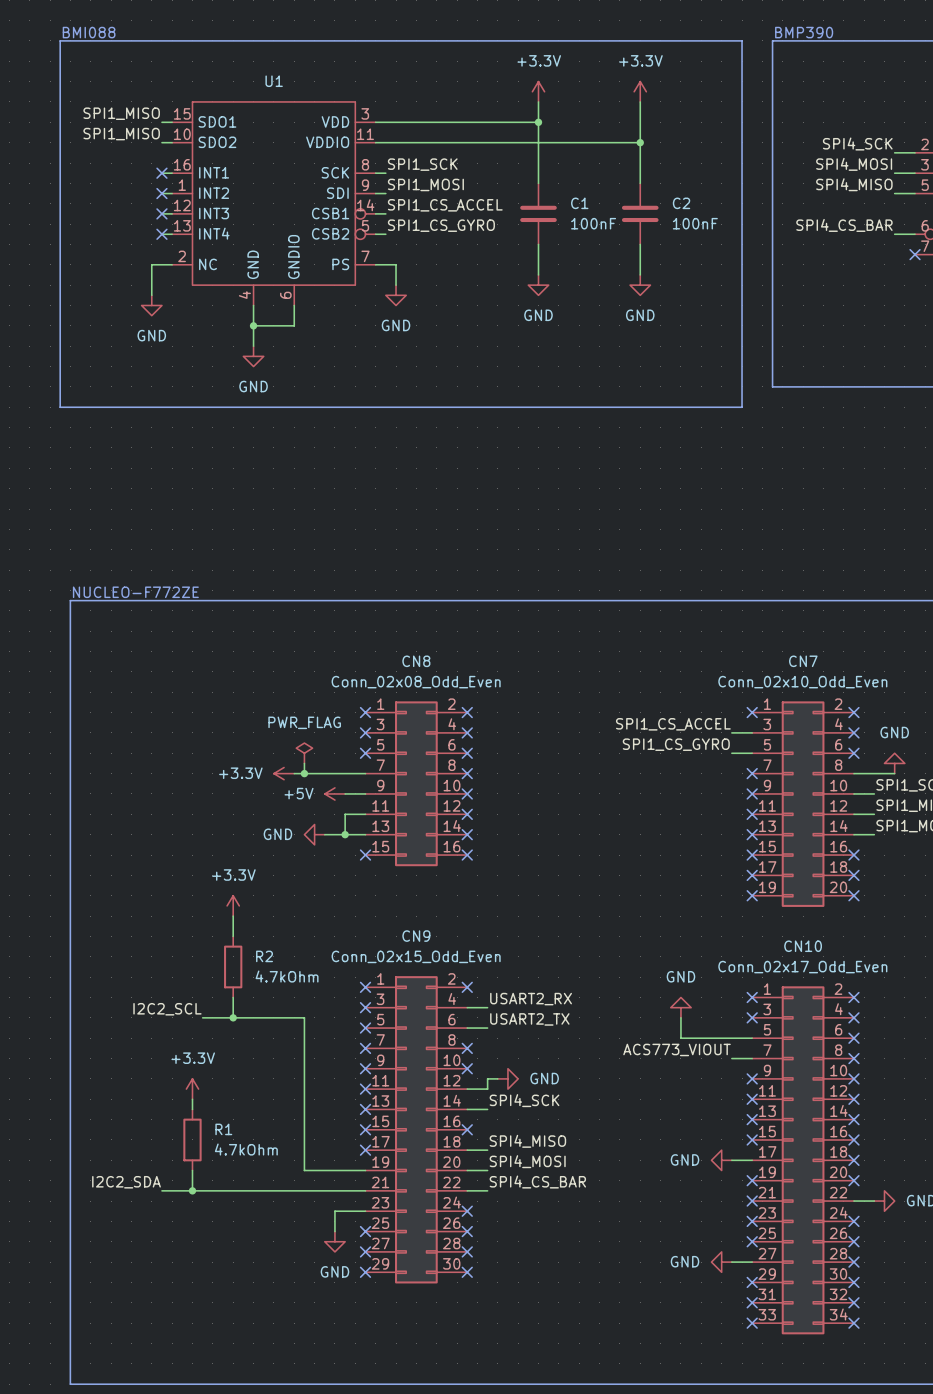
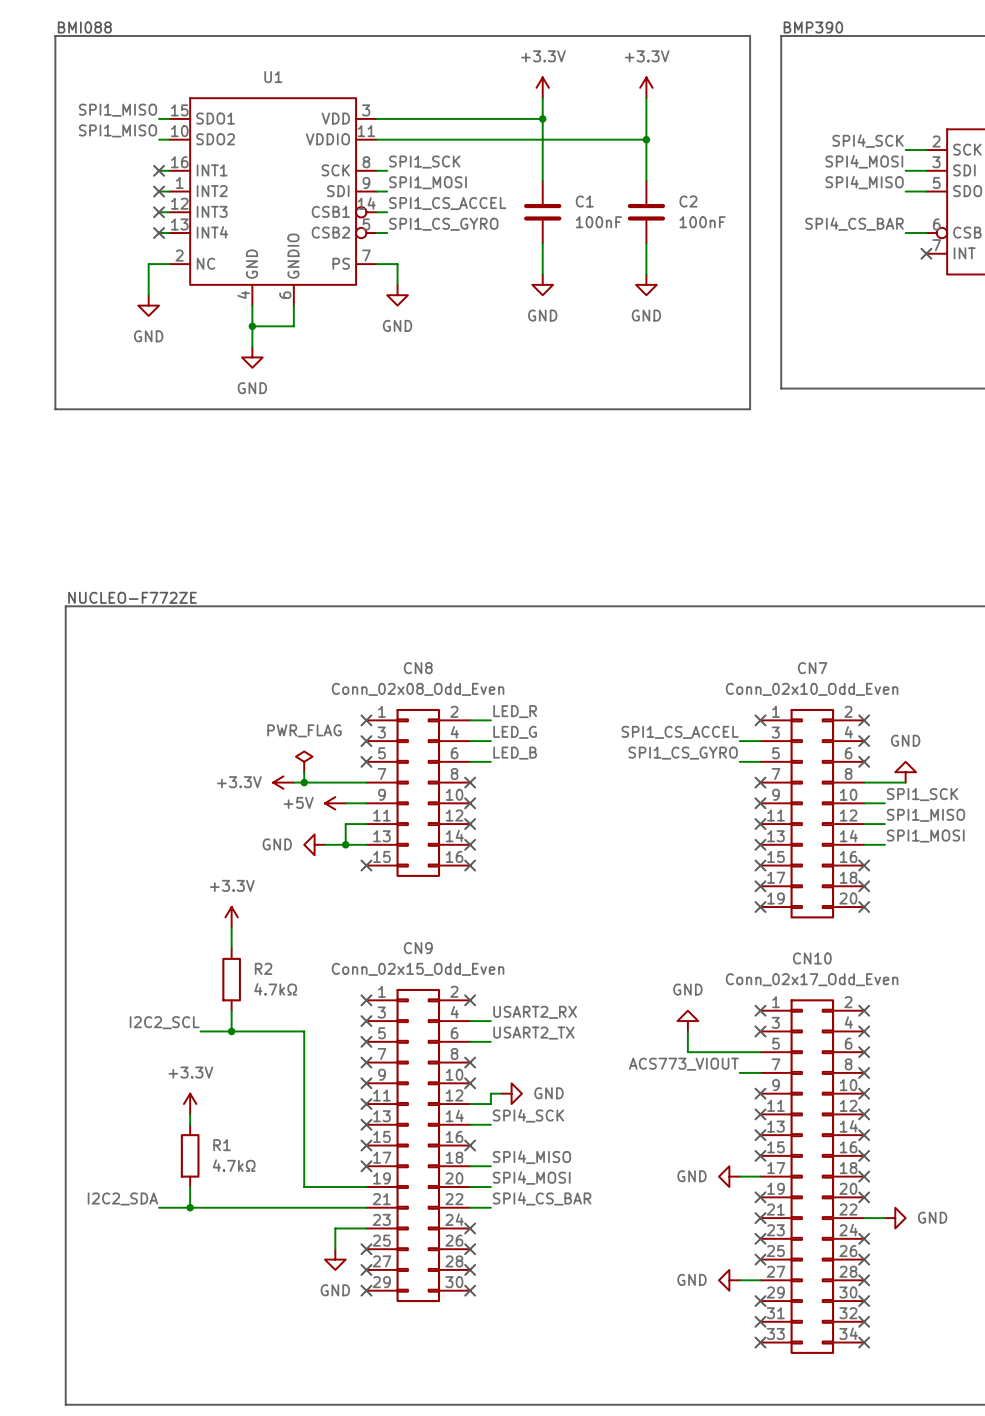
label: none -> LED_R (515, 711)
wire: none -> (470, 720) (490, 720)
no-connect mark: (467, 712) -> none
label: none -> LED_G (515, 732)
wire: none -> (470, 741) (490, 741)
no-connect mark: (467, 732) -> none
label: none -> LED_B (515, 753)
wire: none -> (470, 761) (490, 761)
no-connect mark: (467, 753) -> none
R2 value: 4.7kOhm (287, 976) -> 4.7kΩ (275, 989)
R1 value: 4.7kOhm (246, 1149) -> 4.7kΩ (234, 1165)

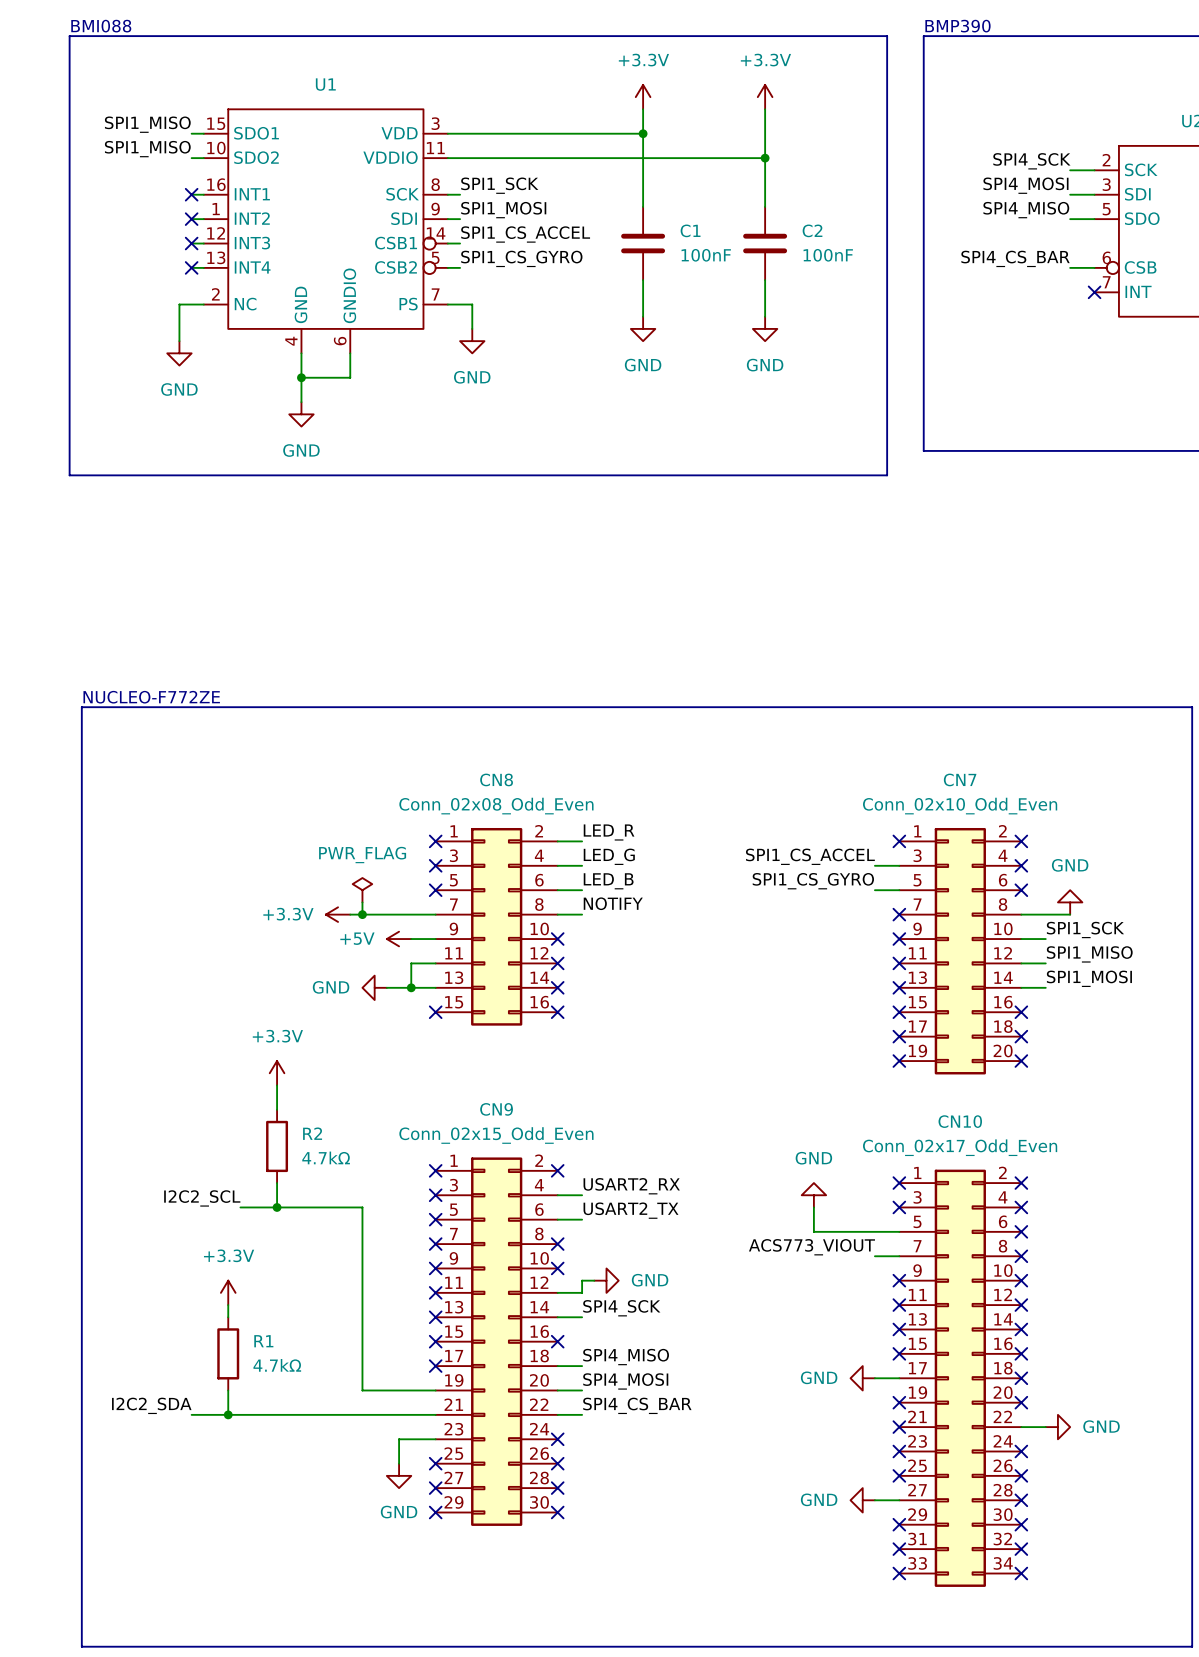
label: none -> NOTIFY (613, 903)
wire: none -> (557, 914) (582, 914)
no-connect mark: (470, 782) -> none

